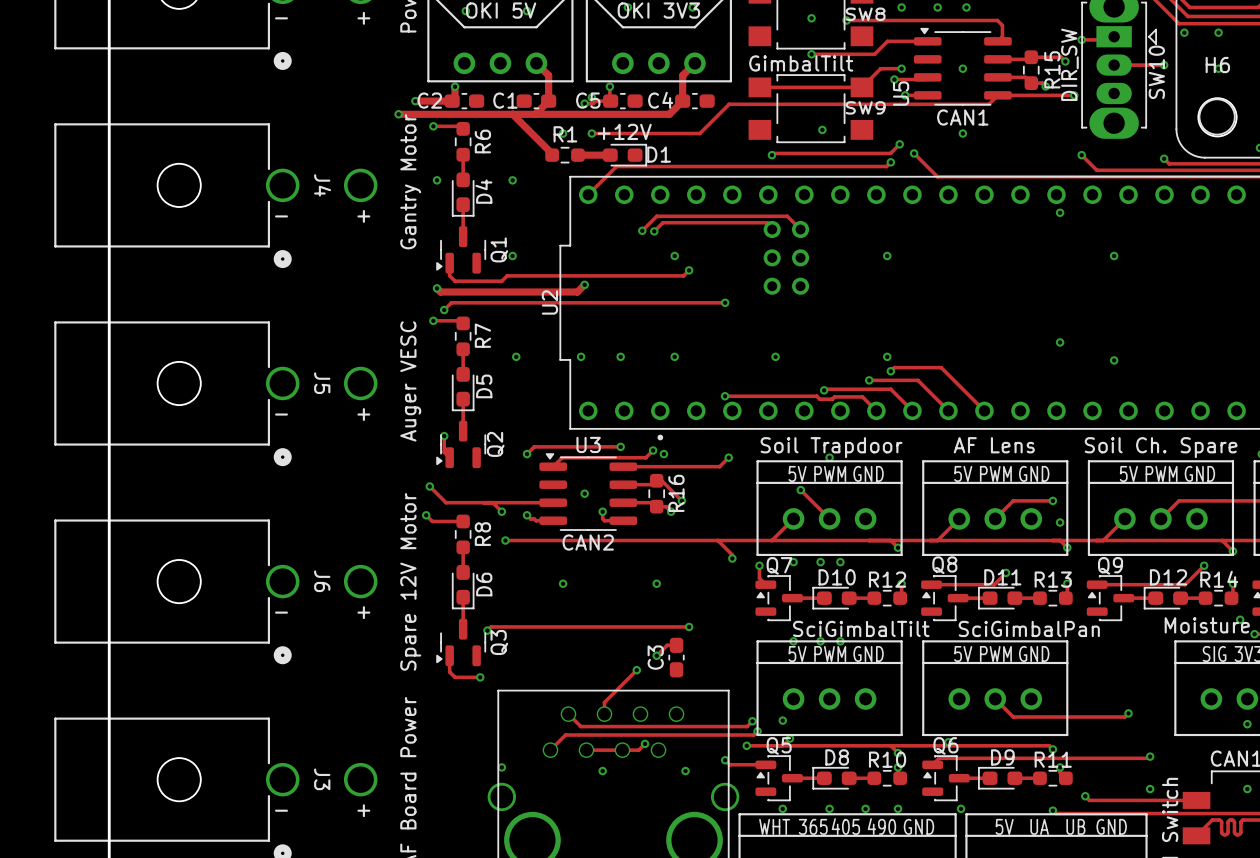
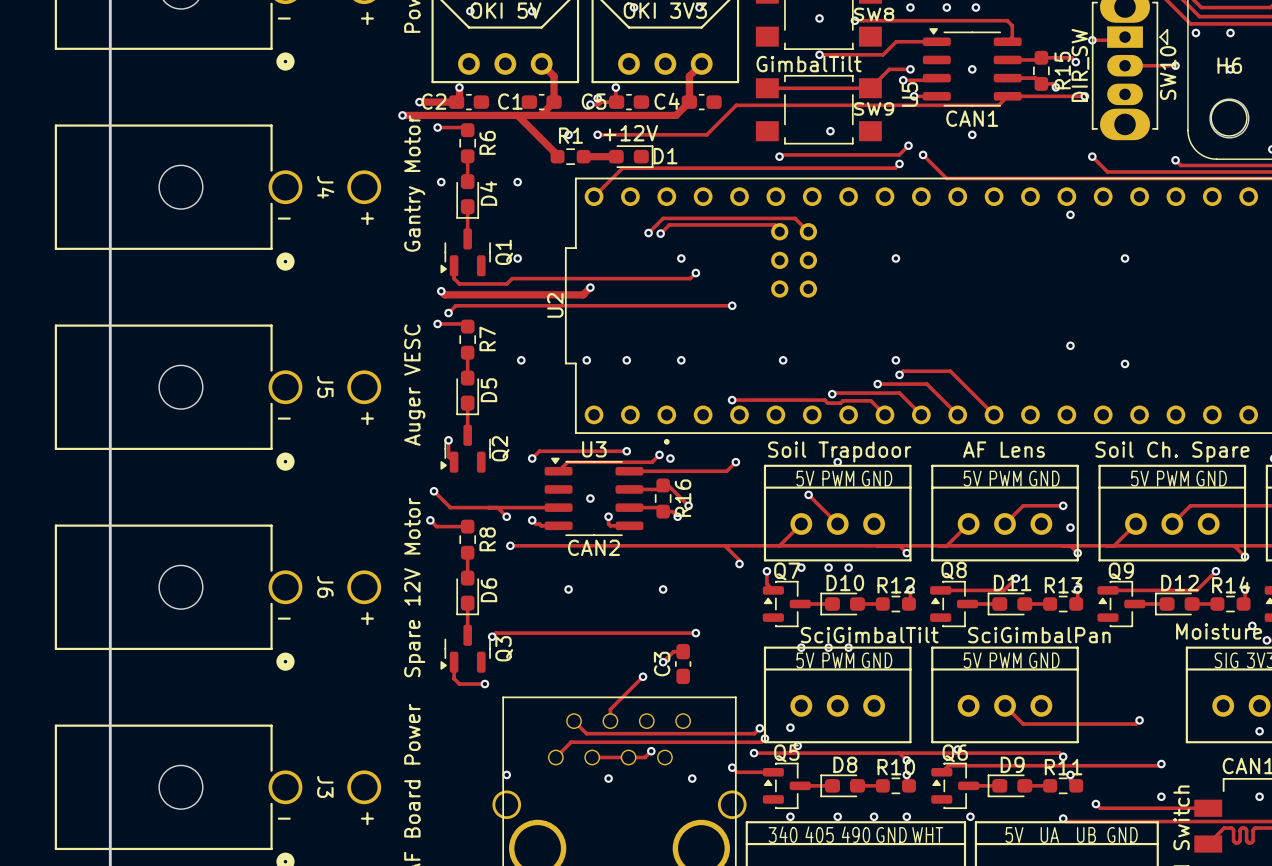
text: WHT (774, 826) -> 340 (783, 834)
text: 365 (813, 826) -> 405 (819, 834)
text: 405 (845, 826) -> 490 (856, 834)
text: 490 (881, 826) -> GND (891, 834)
text: GND (918, 826) -> WHT (927, 834)

